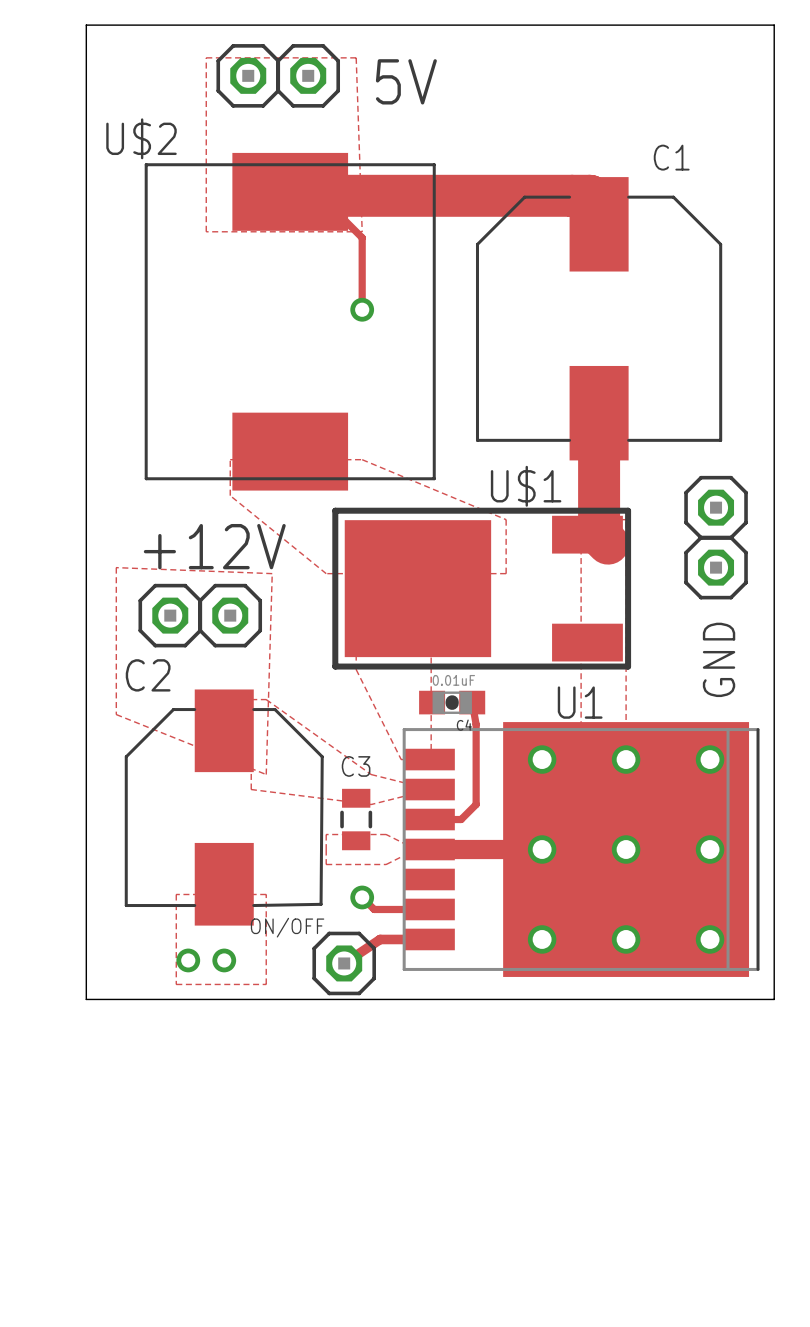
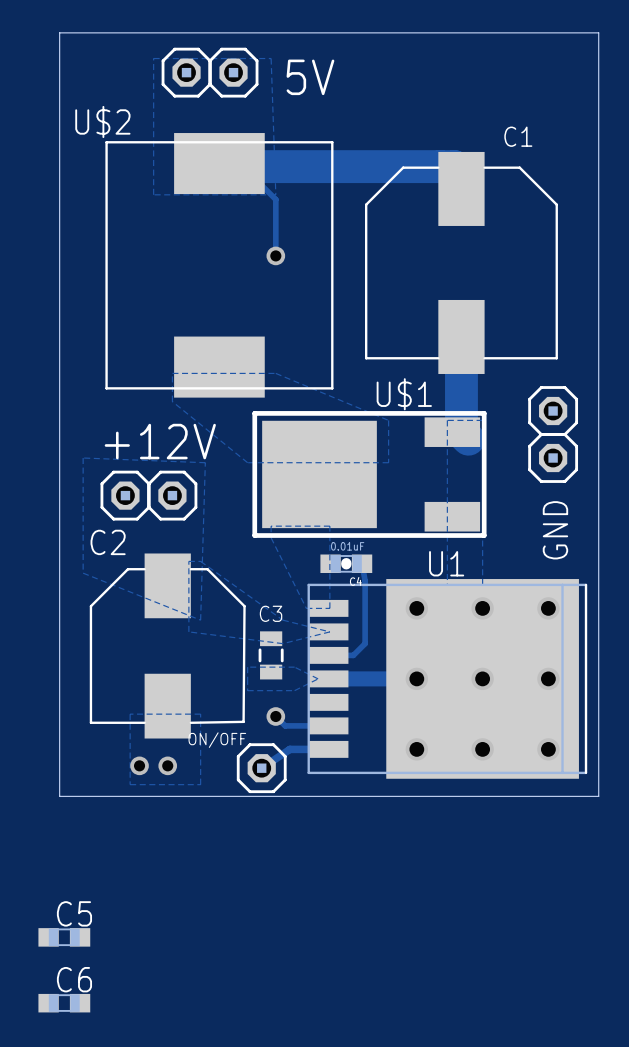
C5: none -> (64, 937)
C6: none -> (64, 1003)

